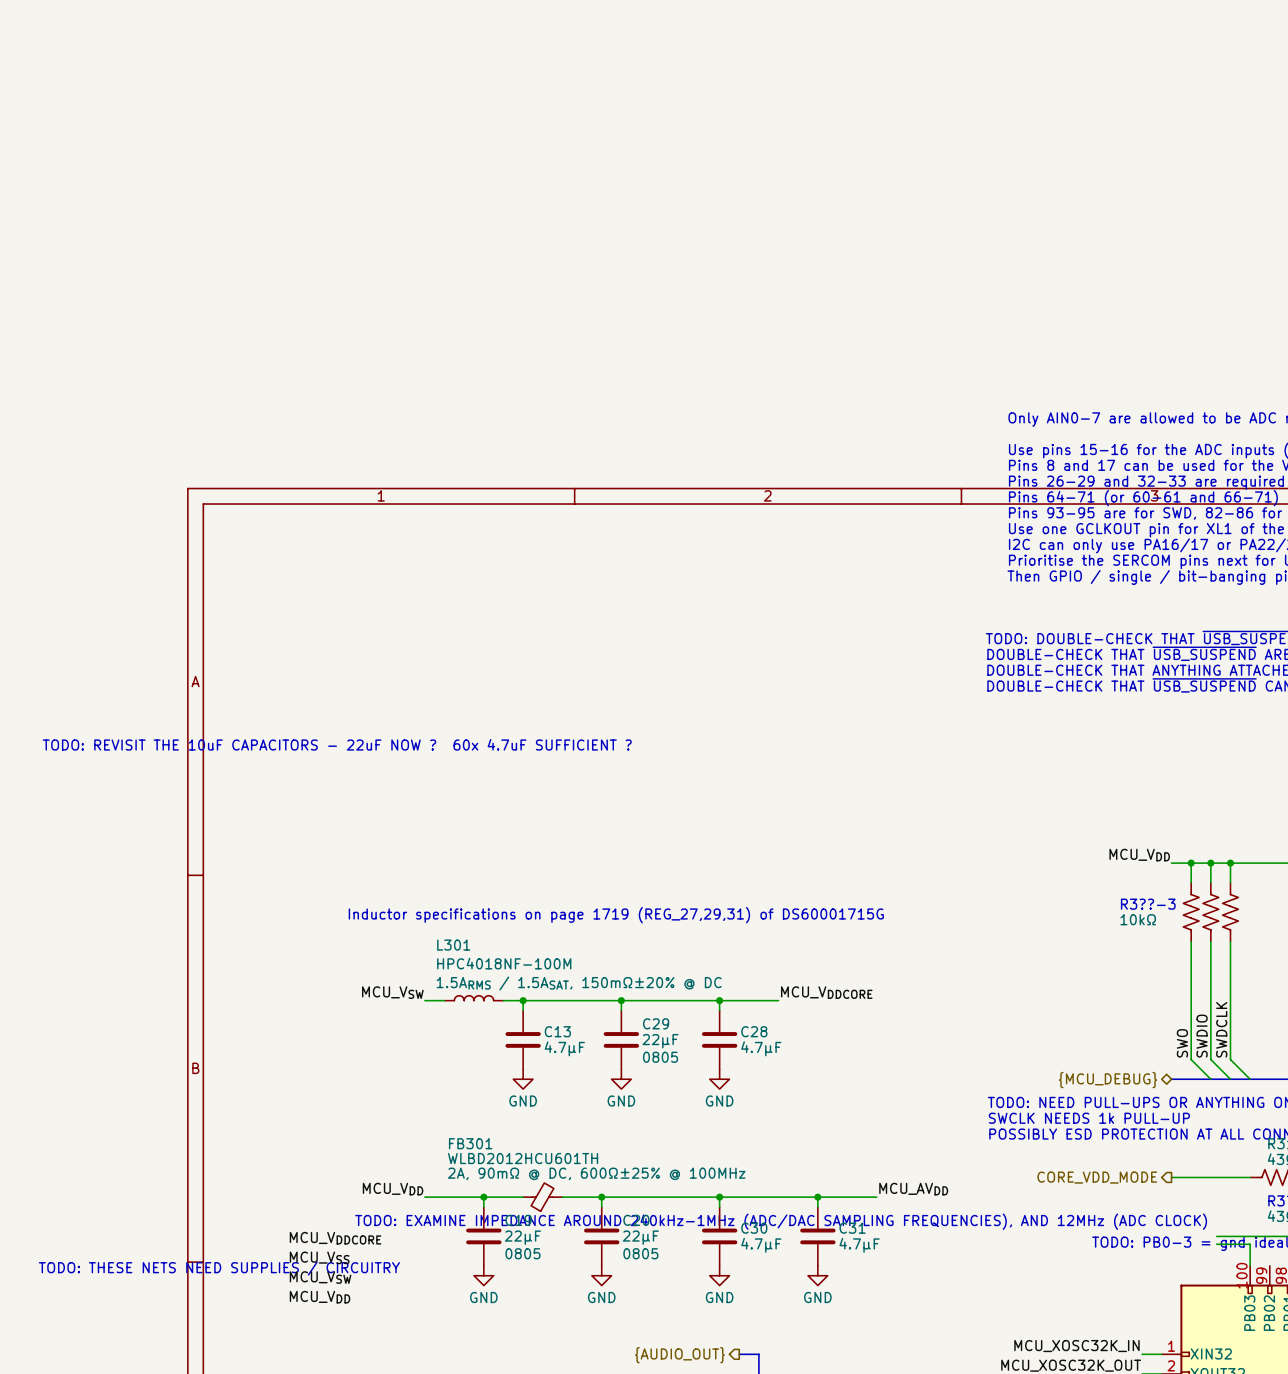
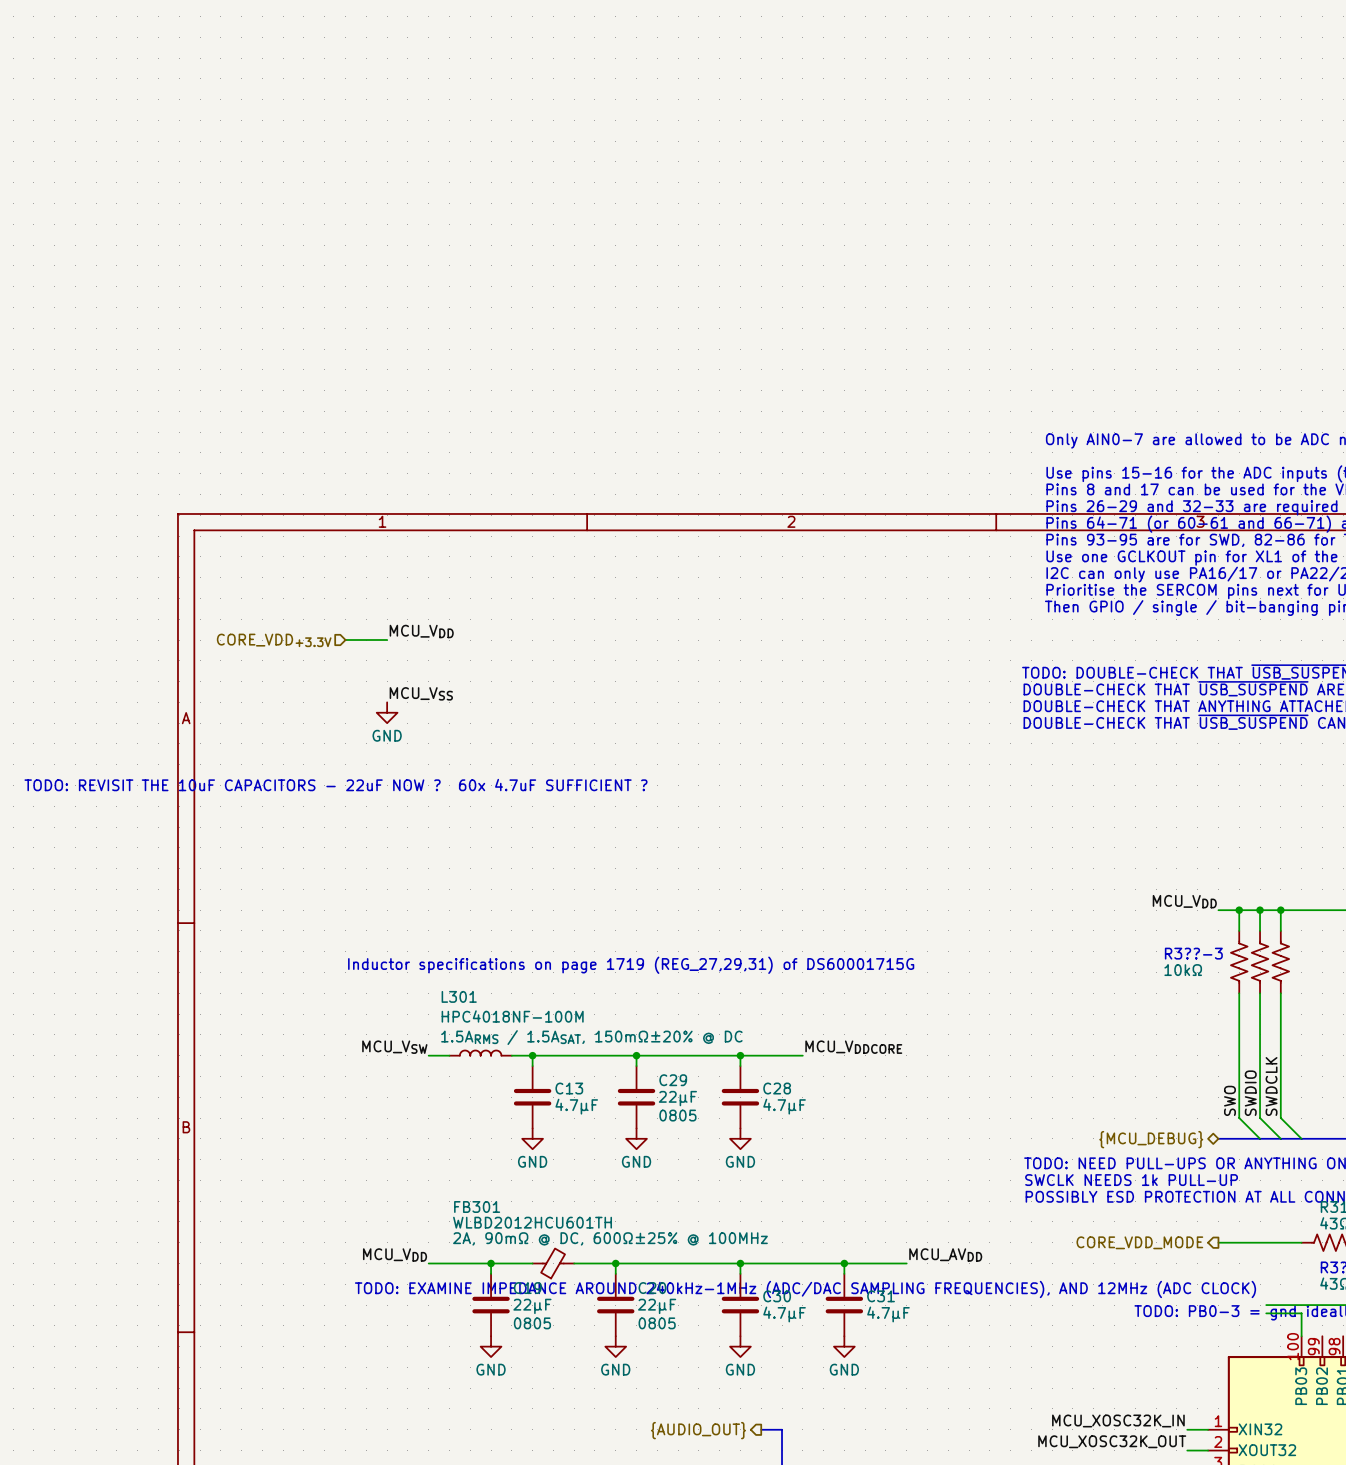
label: none -> MCU_VDD (421, 631)
wire: none -> (345, 640) (387, 640)
hierarchical label: none -> CORE_VDD+3.3V (274, 640)
label: none -> MCU_VSS (421, 693)
power symbol: none -> GND (387, 712)
label: MCU_VDDCORE (335, 1238) -> none
label: MCU_VSS (319, 1257) -> none
text: TODO: THESE NETS NEED SUPPLIES / CIRCUITRY (219, 1268) -> none
label: MCU_VSW (320, 1277) -> none
label: MCU_VDD (320, 1297) -> none

